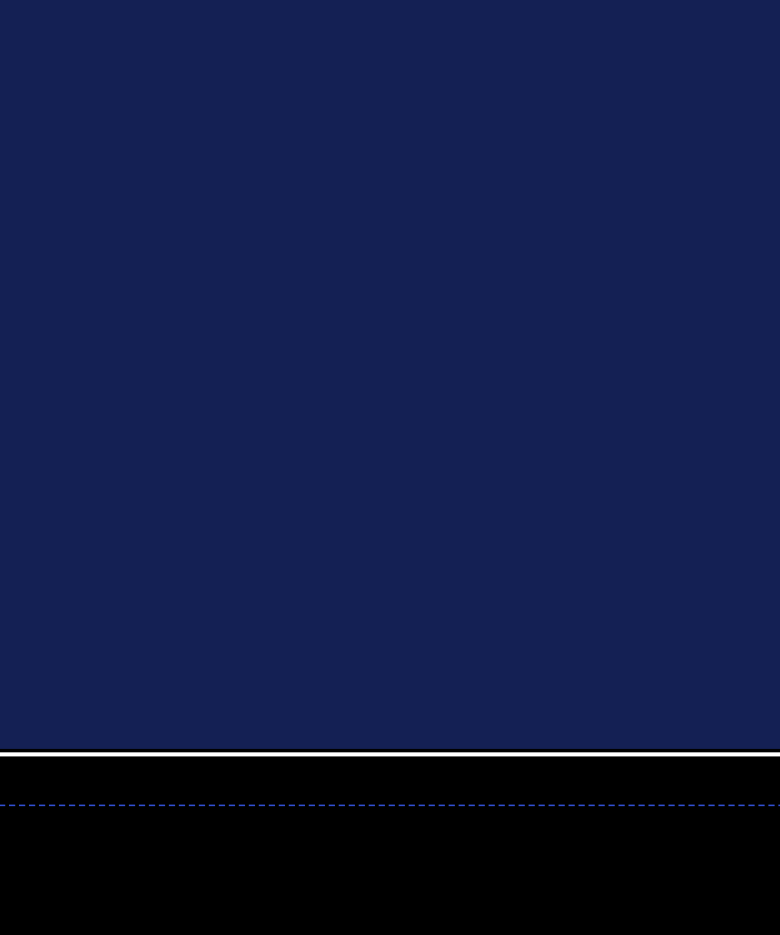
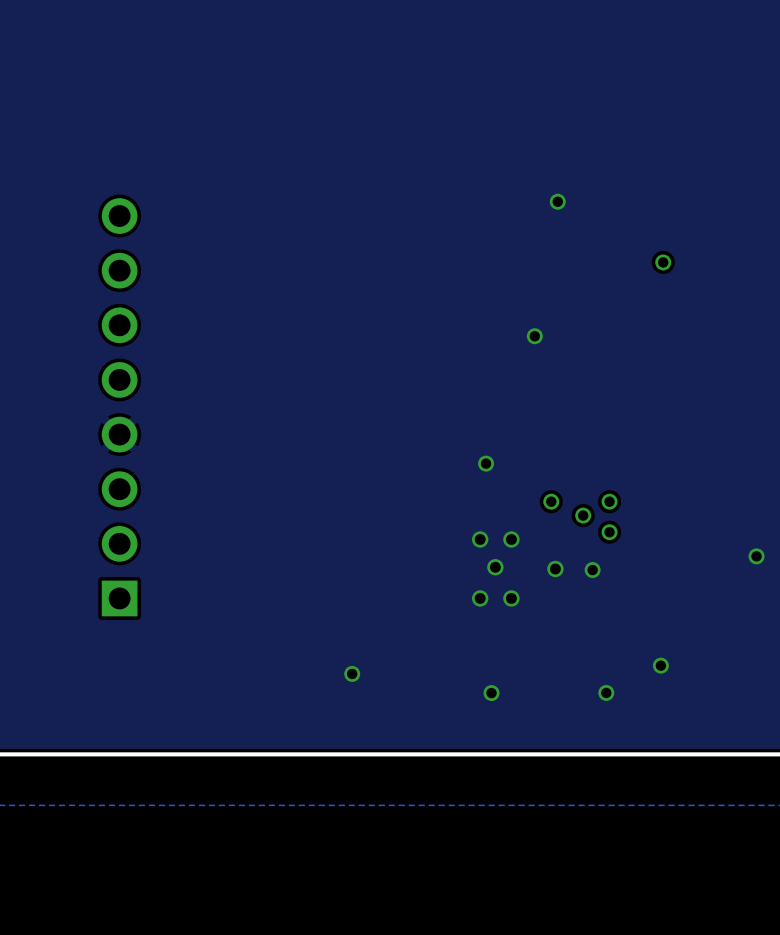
via: none -> (557, 201)
via: none -> (663, 262)
via: none -> (534, 336)
part: none -> (119, 407)
via: none -> (486, 463)
via: none -> (551, 501)
via: none -> (609, 501)
via: none -> (583, 515)
via: none -> (609, 532)
via: none -> (480, 539)
via: none -> (511, 539)
via: none -> (756, 556)
via: none -> (495, 567)
via: none -> (555, 568)
via: none -> (592, 570)
via: none -> (480, 598)
via: none -> (511, 598)
via: none -> (660, 665)
via: none -> (352, 673)
via: none -> (606, 692)
via: none -> (491, 693)

